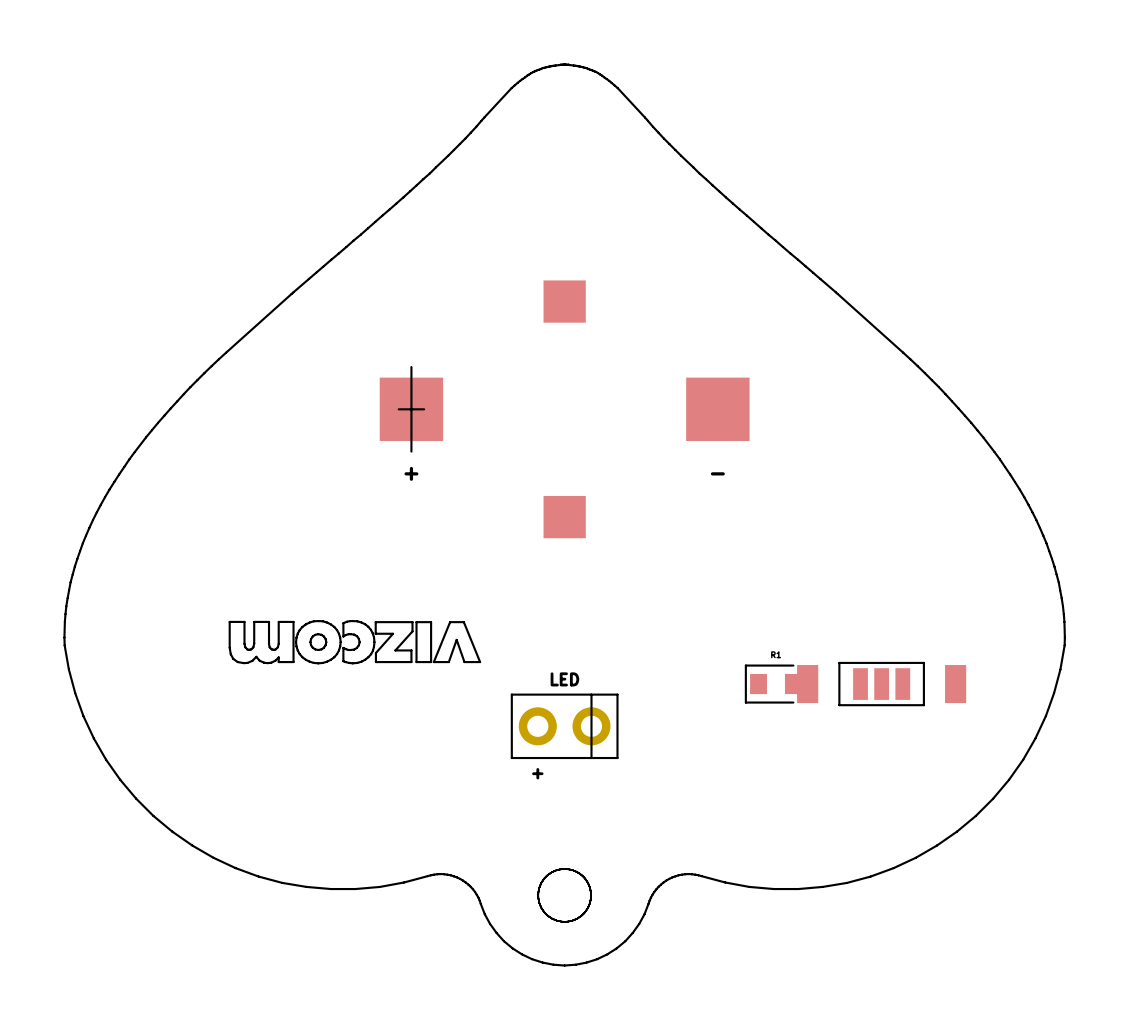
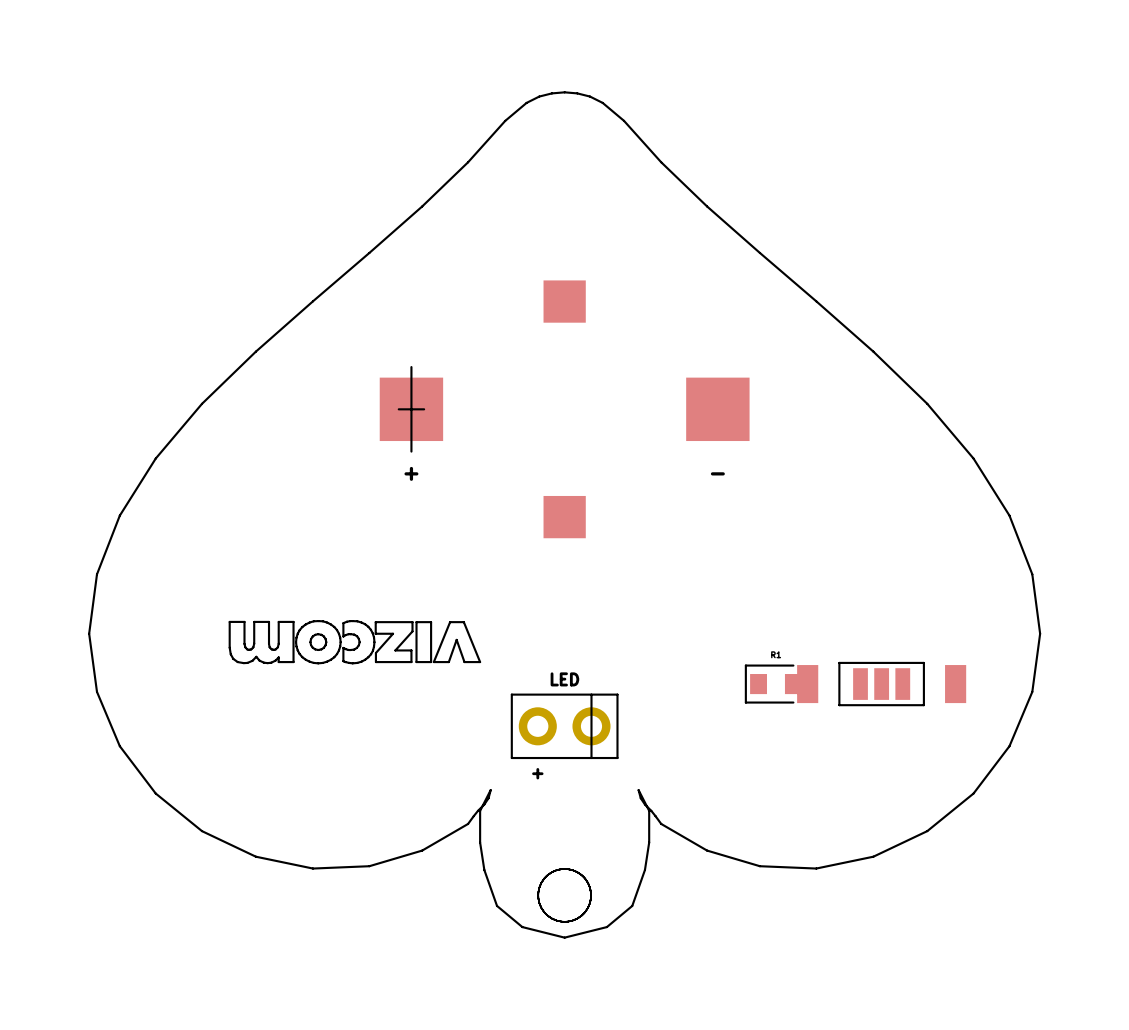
board edge: (564, 64) (580, 66) (596, 72) (617, 88) (663, 138) (699, 173) (910, 359) (971, 422) (1010, 474) (1039, 527) (1058, 582) (1062, 606) (1064, 637) (1060, 669) (1054, 693) (1045, 716) (1023, 759) (1009, 779) (975, 815) (937, 845) (915, 857) (870, 876) (822, 886) (773, 889) (749, 886) (695, 874) (678, 875) (666, 880) (656, 889) (639, 923) (616, 948) (597, 959) (564, 965) (532, 959) (512, 948) (490, 923) (472, 889) (463, 880) (450, 875) (434, 874) (379, 886) (355, 889) (306, 886) (258, 876) (213, 857) (192, 845) (153, 815) (120, 779) (106, 759) (83, 716) (75, 693) (68, 669) (64, 637) (66, 606) (70, 582) (89, 527) (119, 474) (158, 422) (218, 359) (429, 173) (465, 138) (511, 88) (533, 72) (549, 66) (564, 64) -> (564, 92) (539, 96) (526, 102) (505, 120) (468, 162) (422, 206) (255, 351) (202, 403) (155, 458) (119, 515) (96, 574) (89, 633) (96, 691) (119, 746) (155, 793) (202, 831) (255, 856) (312, 868) (369, 866) (422, 850) (468, 823) (478, 810) (484, 804) (490, 790) (480, 810) (480, 842) (484, 870) (497, 905) (522, 927) (564, 937) (606, 927) (632, 905) (644, 870) (649, 842) (649, 810) (638, 790) (644, 804) (651, 810) (661, 823) (707, 850) (759, 866) (816, 868) (873, 856) (927, 831) (973, 793) (1009, 746) (1032, 691) (1040, 633) (1032, 574) (1009, 515) (973, 458) (927, 403) (873, 351) (707, 206) (661, 162) (624, 120) (602, 102) (590, 96) (564, 92)

